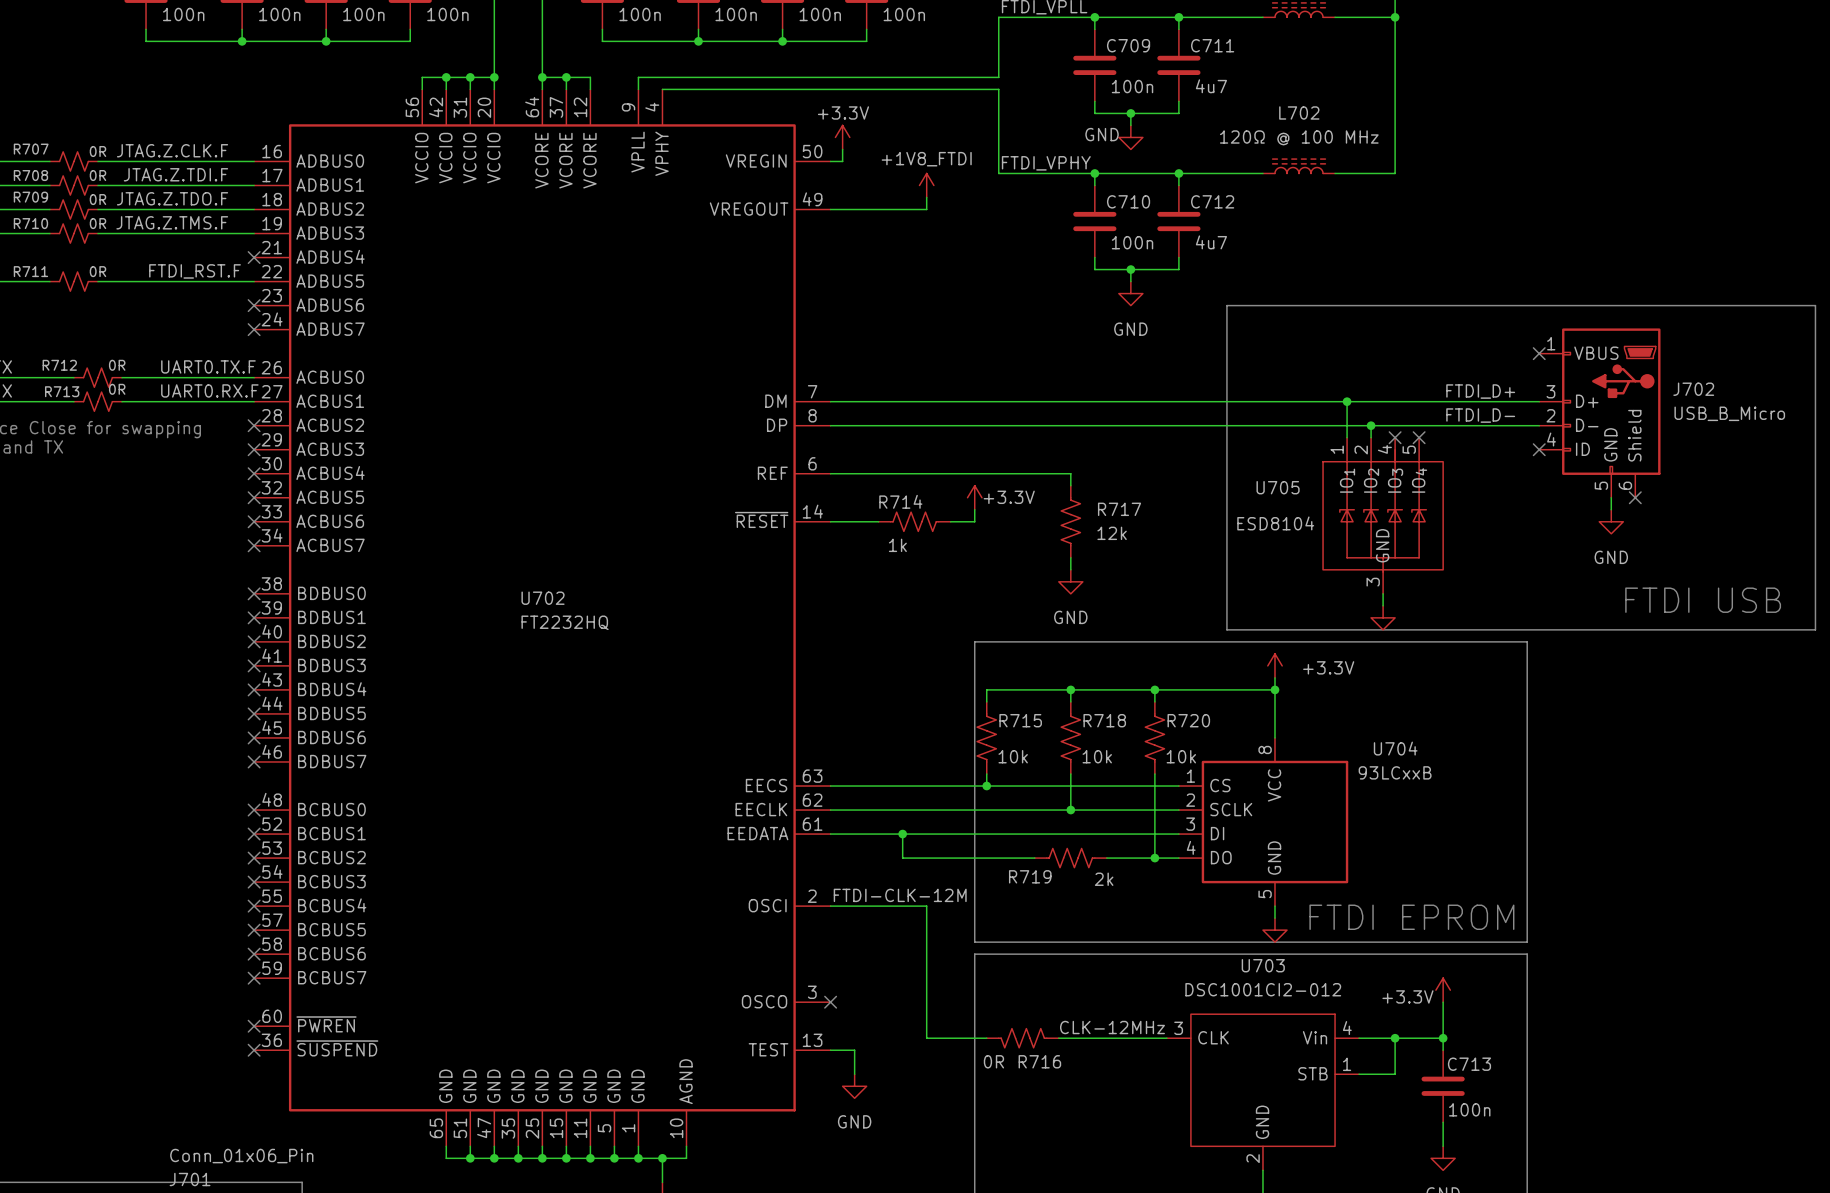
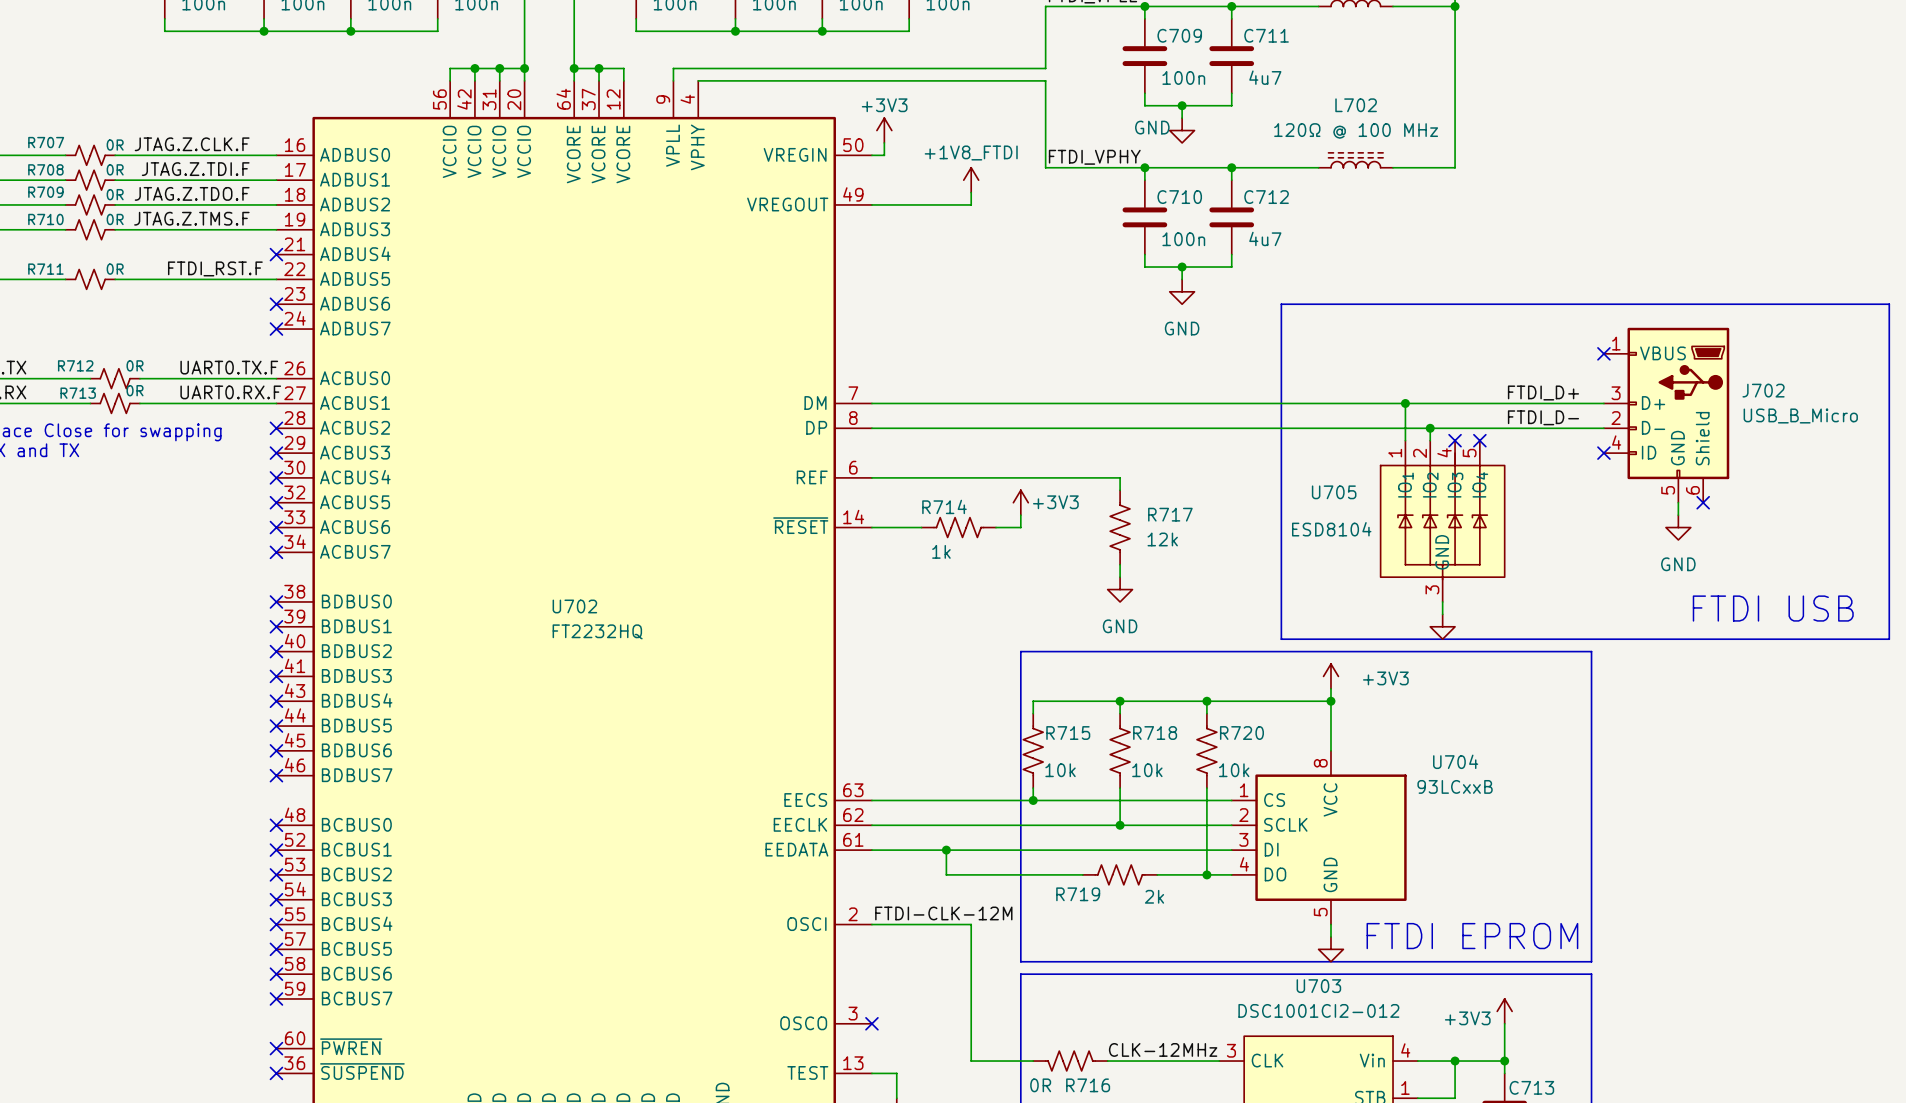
power symbol: +3.3V (842, 137) -> +3V3 (884, 130)
power symbol: +3.3V (974, 497) -> +3V3 (1020, 502)
power symbol: +3.3V (1274, 665) -> +3V3 (1330, 676)
power symbol: +3.3V (1443, 990) -> +3V3 (1504, 1011)

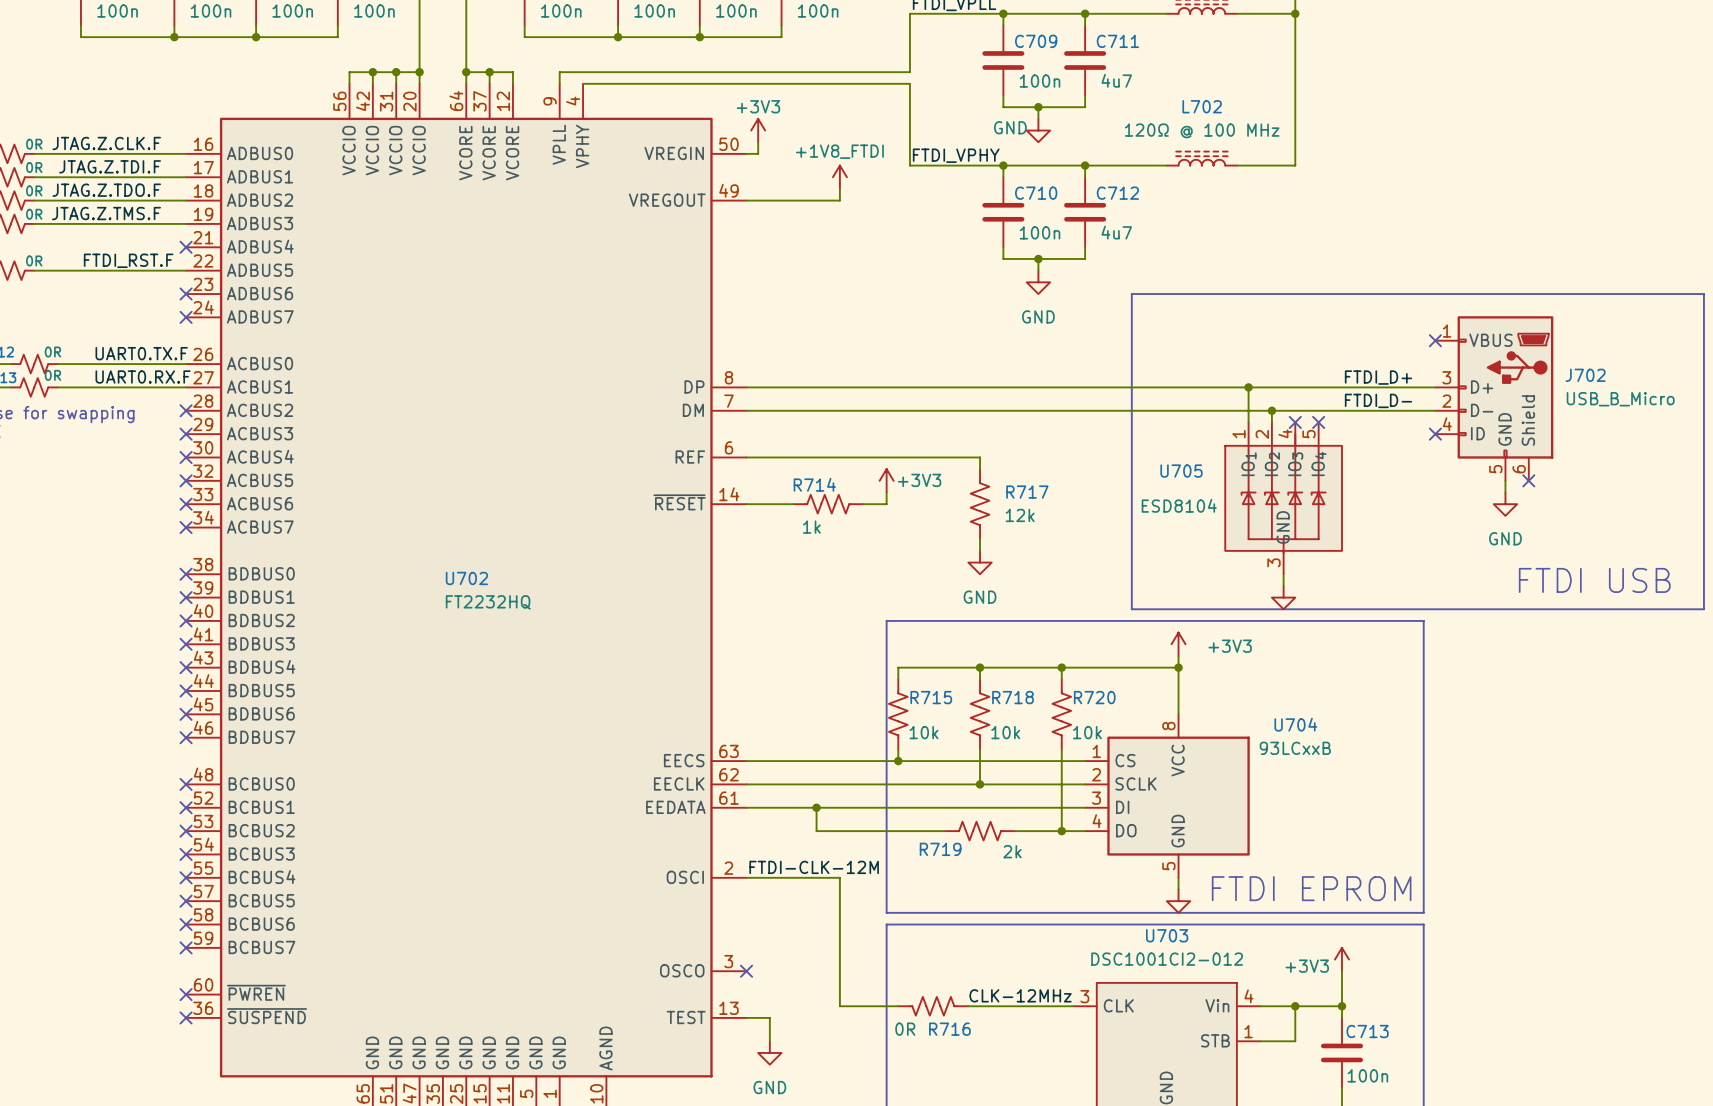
U702 pin number: 7 (853, 393) -> 8 (728, 377)
U702 pin name: DM (815, 403) -> DP (694, 386)
U702 pin number: 8 (853, 418) -> 7 (728, 401)
U702 pin name: DP (816, 427) -> DM (693, 410)

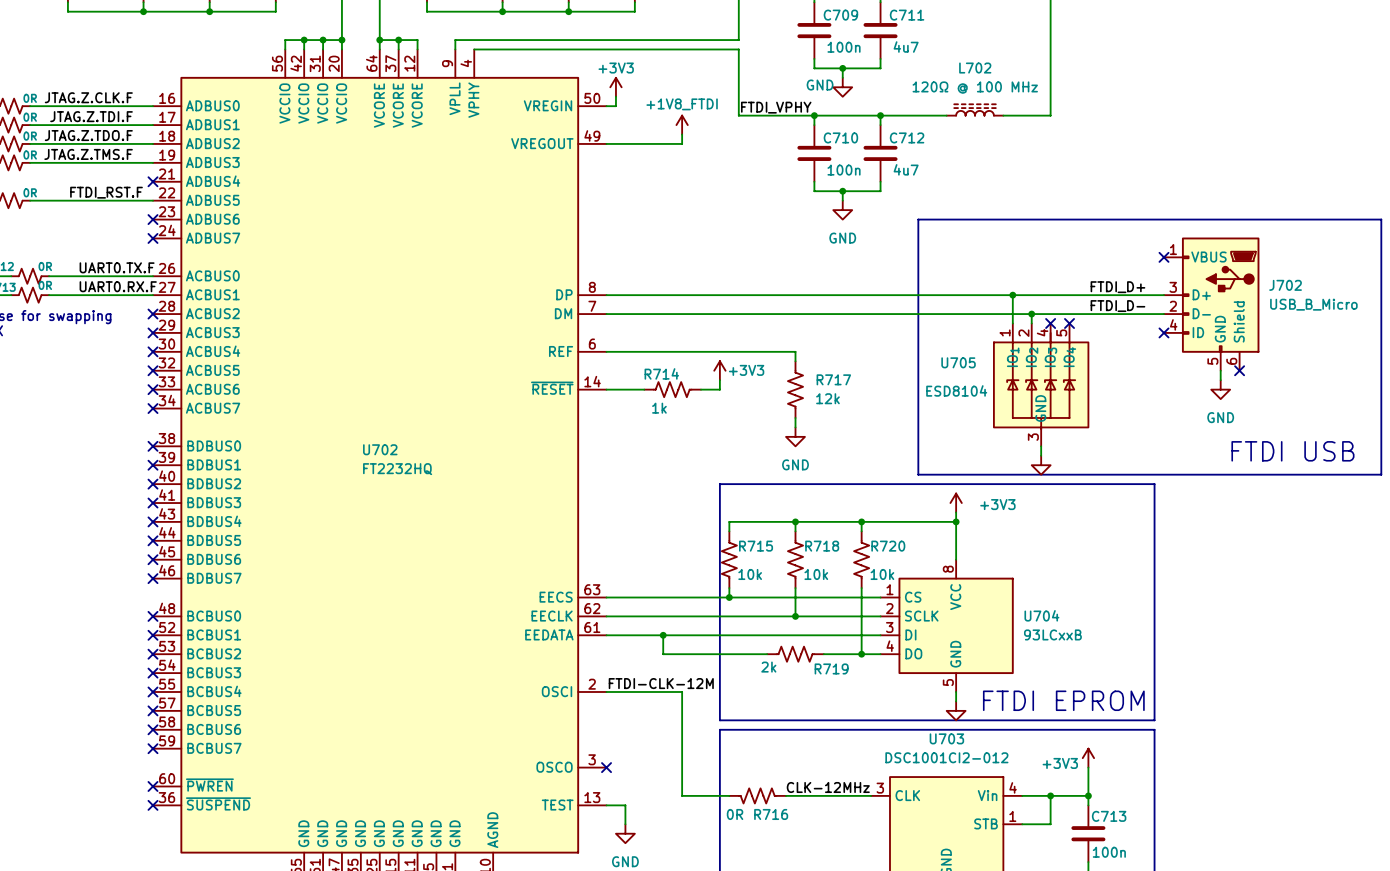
U704 name position: U704 (1295, 724) -> U704 (1041, 615)
U704 value position: 93LCxxB (1295, 748) -> 93LCxxB (1052, 634)
R719 name position: R719 (940, 849) -> R719 (831, 668)
R719 value position: 2k (1012, 851) -> 2k (768, 667)

